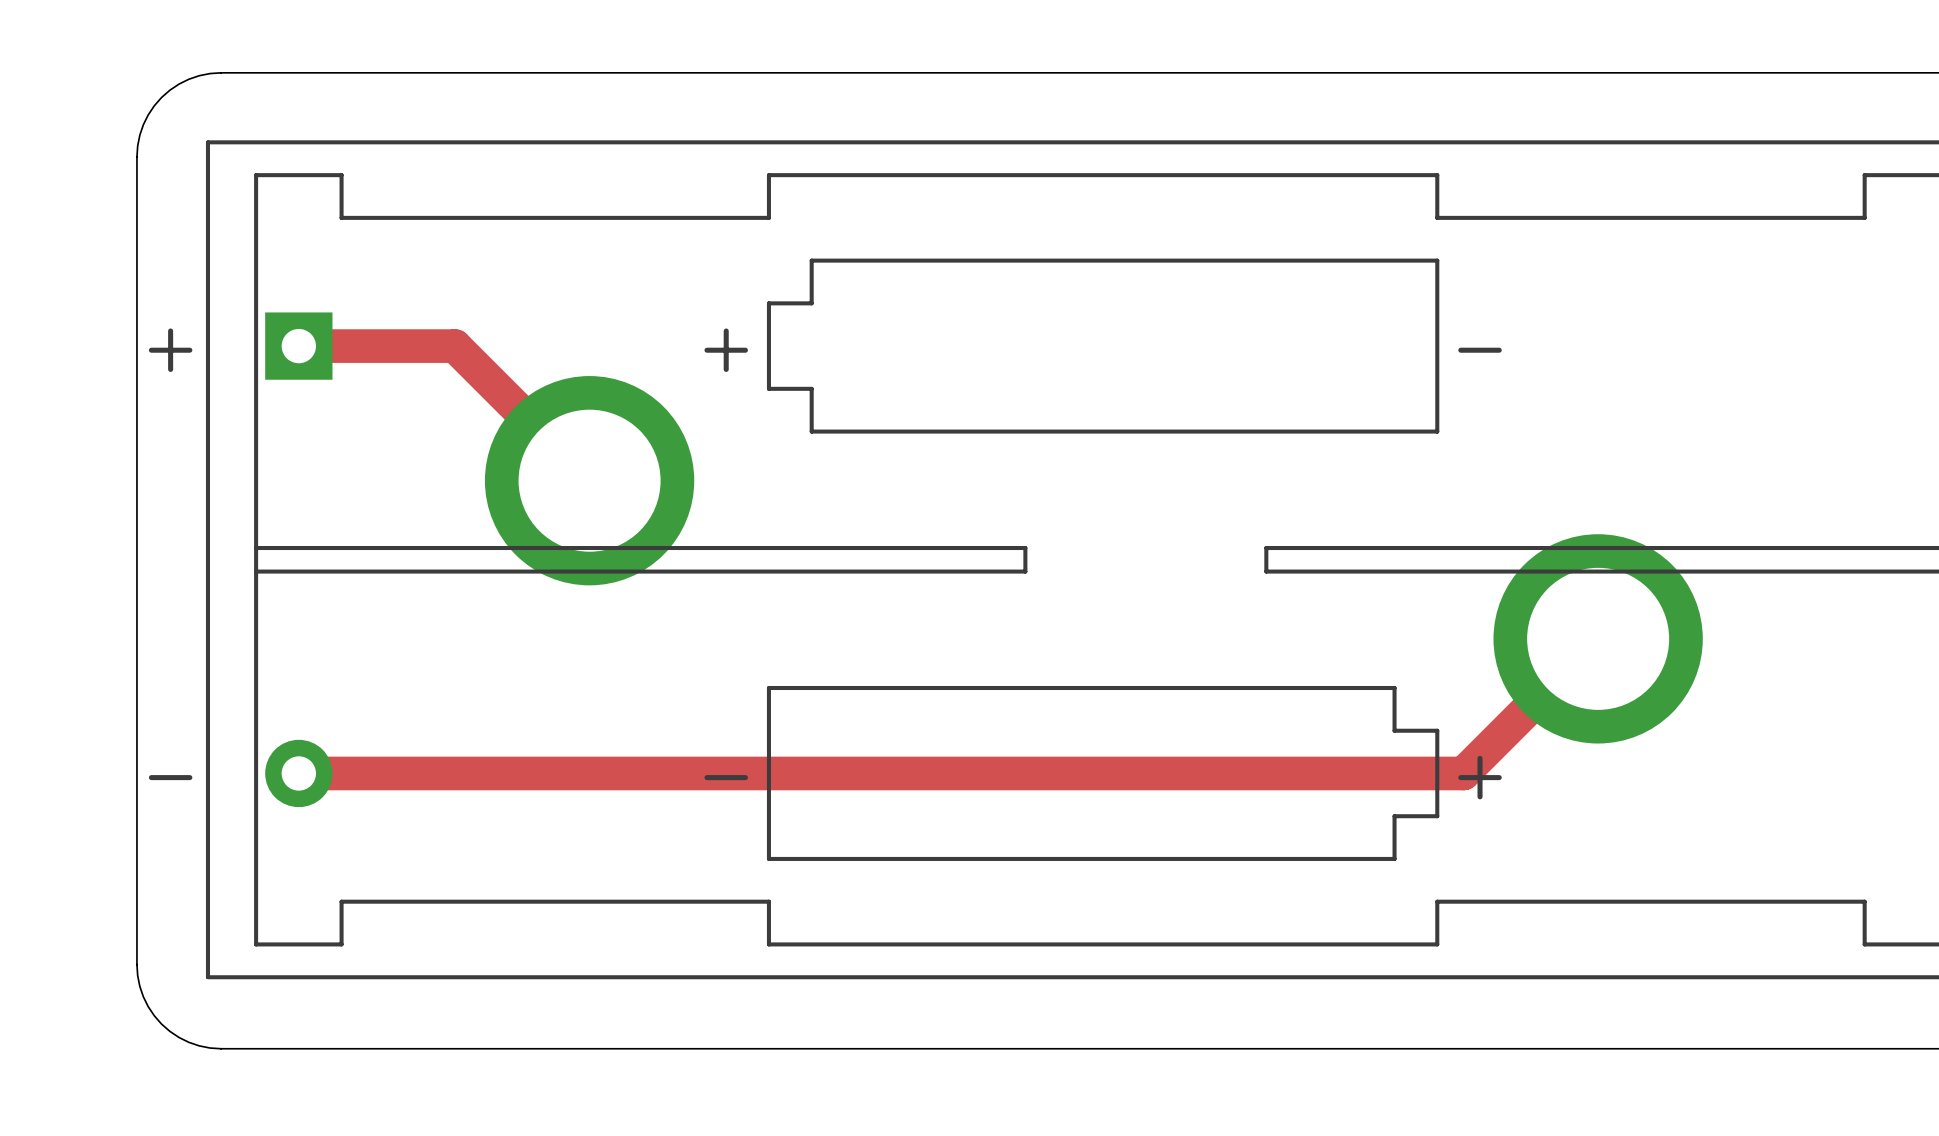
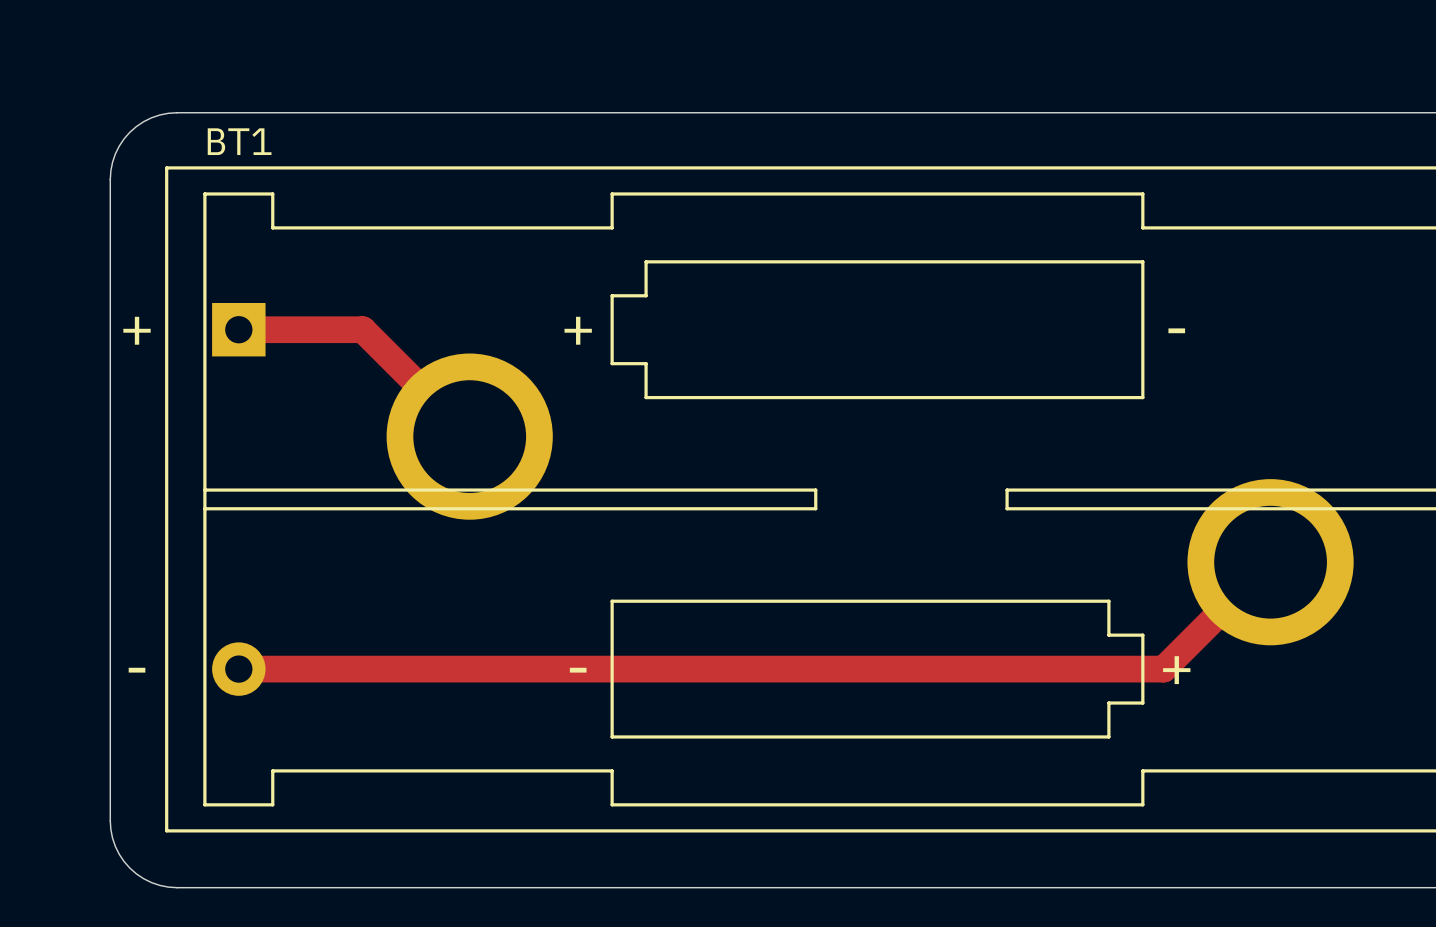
BT1 name: none -> BT1 (239, 141)

